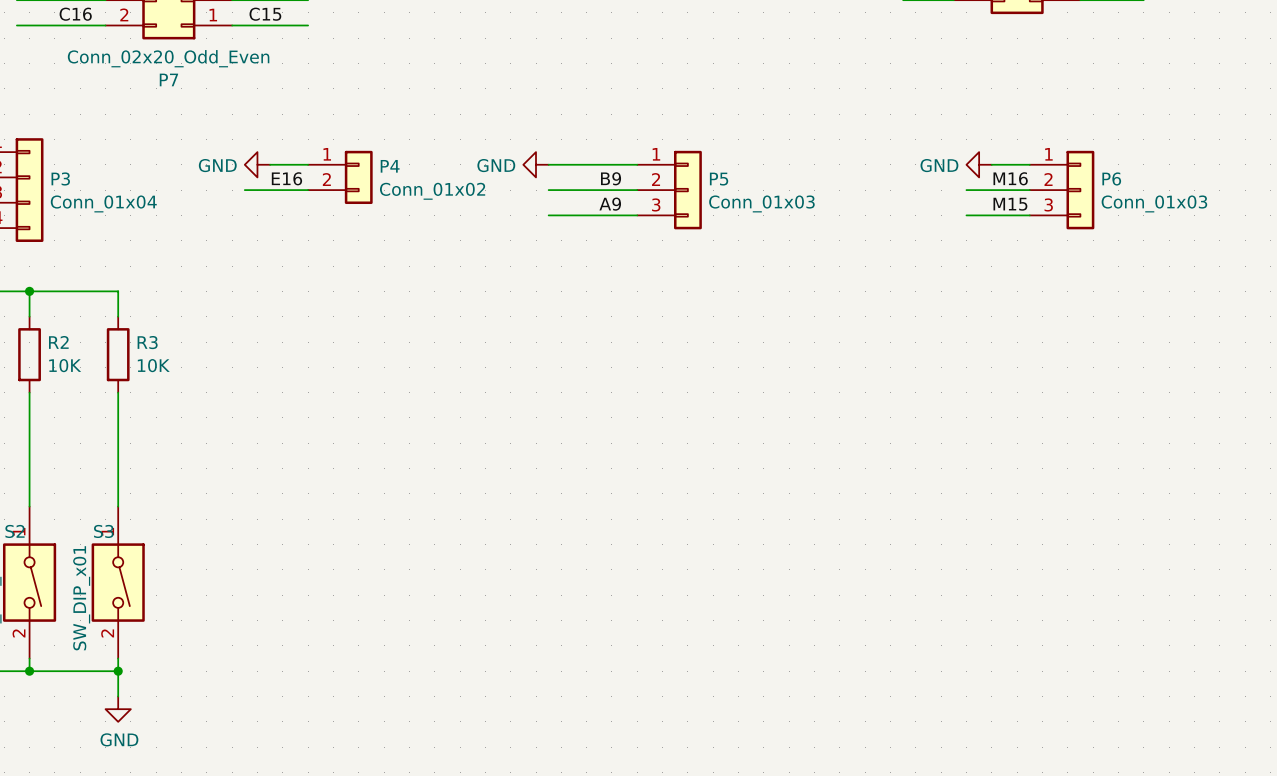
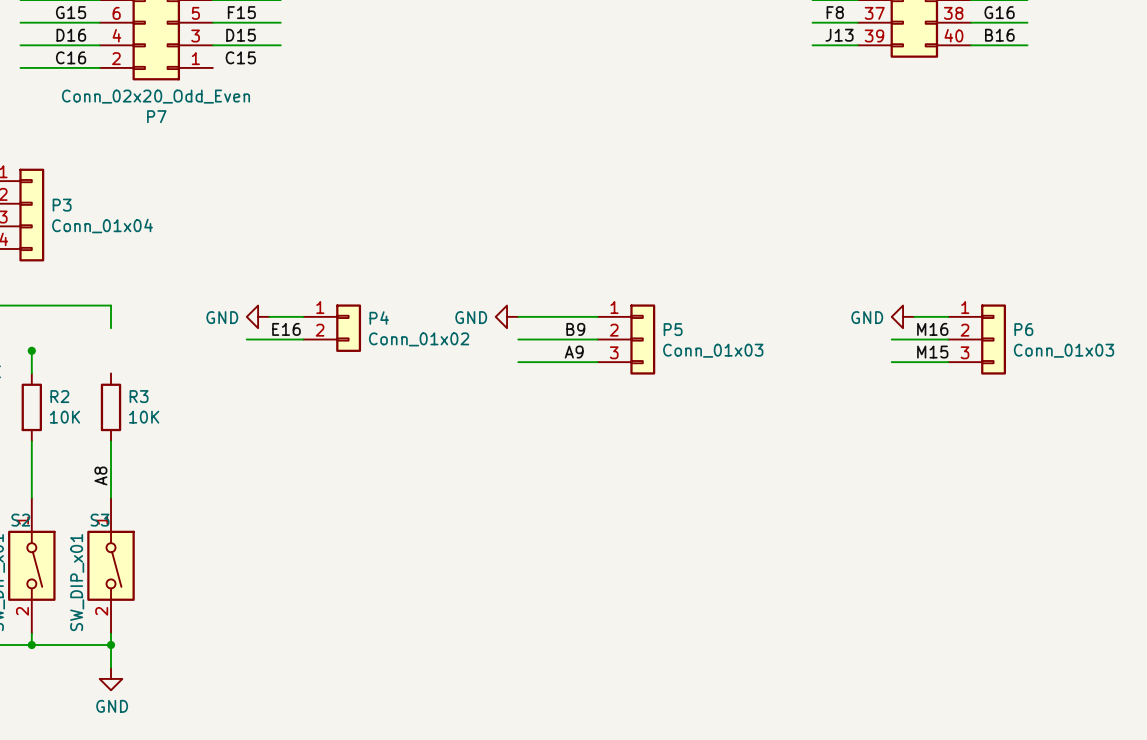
wire: (232, 25) (308, 25) -> none
power symbol position: GND (257, 164) -> GND (258, 316)
wire: (270, 164) (308, 164) -> (269, 316) (303, 316)
power symbol position: GND (536, 164) -> GND (507, 316)
wire: (548, 164) (637, 164) -> (518, 316) (597, 316)
power symbol position: GND (979, 164) -> GND (903, 316)
wire: (991, 164) (1029, 164) -> (914, 316) (948, 316)
P4 position: (340, 177) -> (332, 328)
label position: E16 (286, 178) -> E16 (286, 329)
label position: B9 (611, 178) -> B9 (575, 329)
label position: M16 (1010, 178) -> M16 (932, 329)
wire: (244, 190) (308, 190) -> (246, 339) (303, 339)
wire: (548, 190) (637, 190) -> (518, 339) (597, 339)
P5 position: (669, 190) -> (626, 339)
wire: (966, 190) (1029, 190) -> (891, 339) (948, 339)
P6 position: (1062, 190) -> (977, 339)
label position: A9 (610, 204) -> A9 (574, 352)
label position: M15 (1010, 204) -> M15 (932, 352)
wire: (548, 215) (637, 215) -> (518, 362) (597, 362)
wire: (966, 215) (1029, 215) -> (891, 362) (948, 362)
wire: (29, 291) (29, 316) -> (31, 350) (31, 373)
junction position: (29, 291) -> (31, 350)
R2 position: (29, 354) -> (31, 407)
R3 position: (118, 354) -> (111, 407)
wire: (29, 392) (29, 443) -> none
wire: (118, 392) (118, 443) -> none
label: none -> A8 (100, 476)

